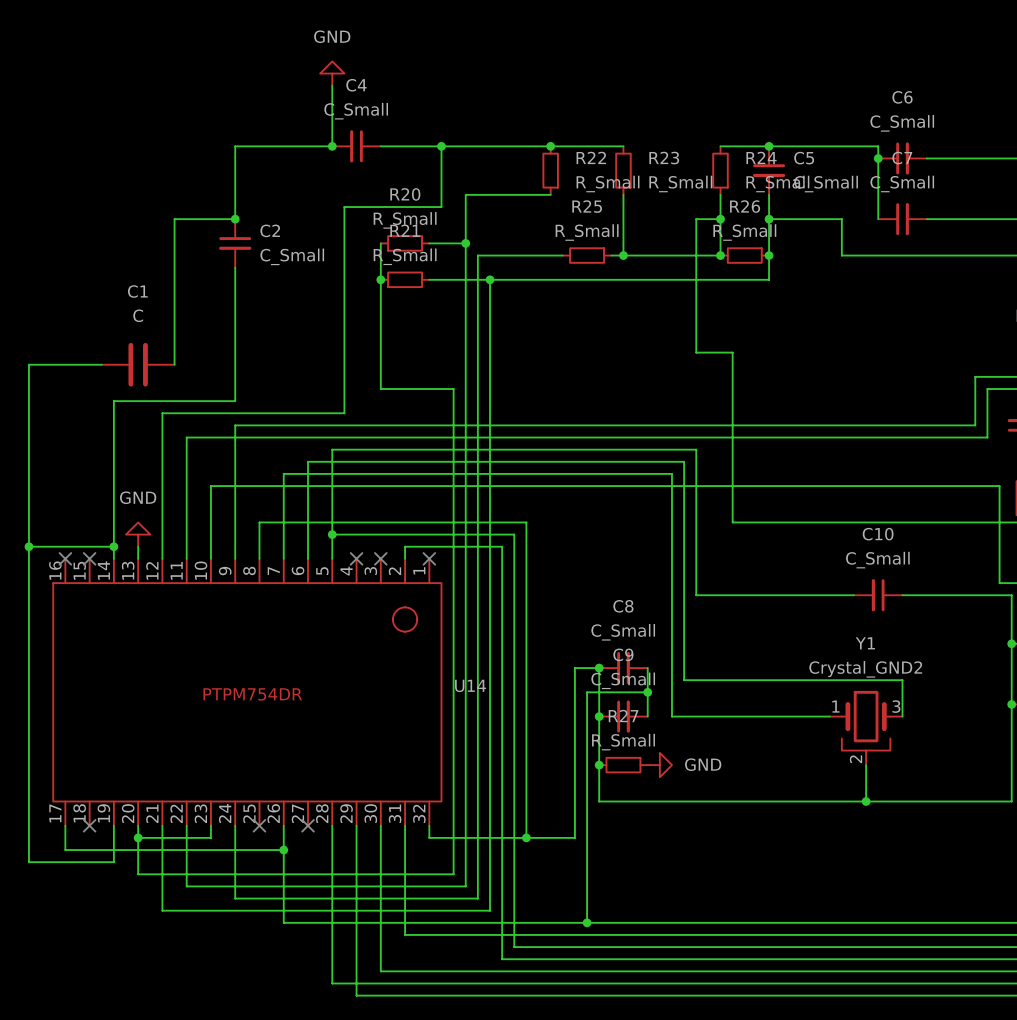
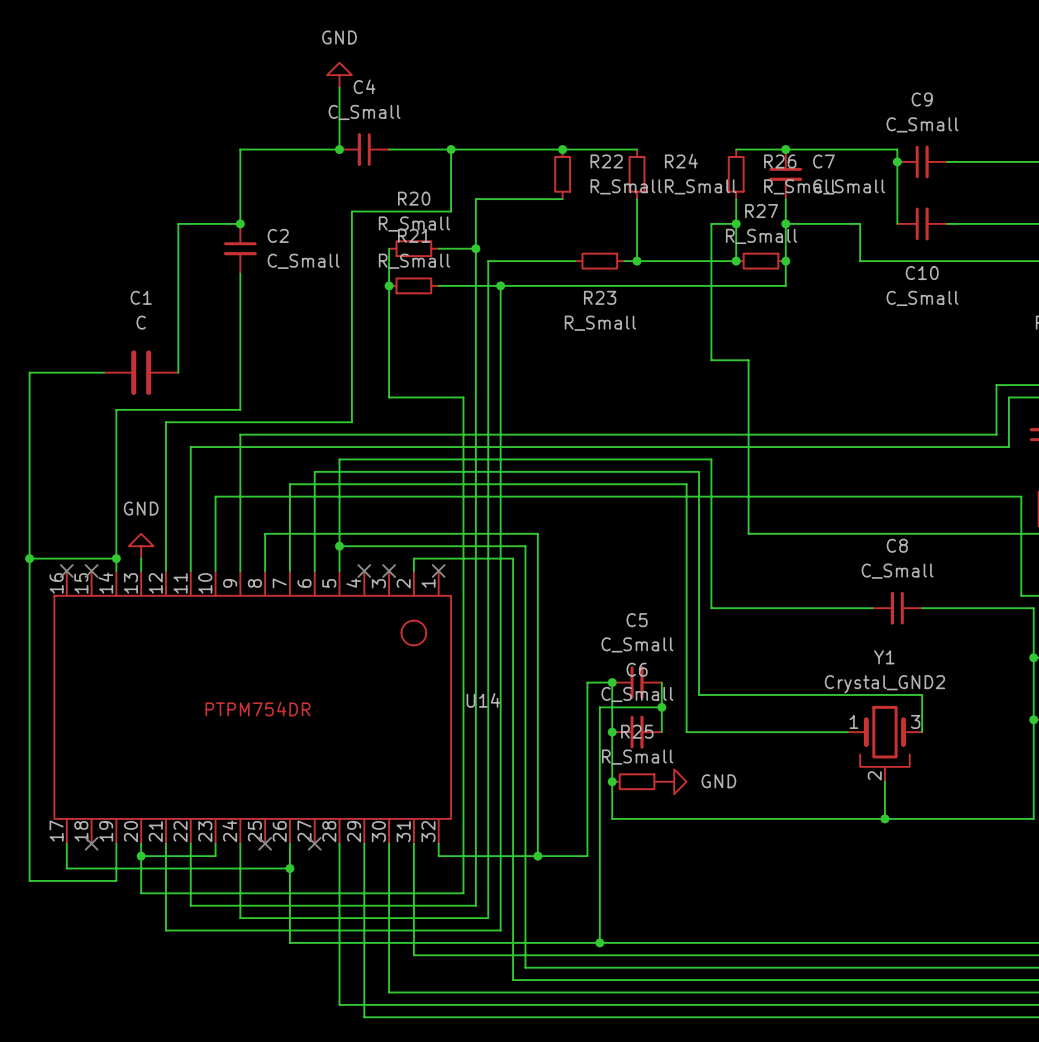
C6 name: C6 (902, 97) -> C9 (922, 99)
R24 name: R24 (761, 157) -> R26 (780, 161)
R23 name: R23 (664, 158) -> R24 (681, 161)
C5 name: C5 (804, 158) -> C7 (823, 161)
C7 name: C7 (902, 158) -> C10 (922, 273)
C7 value position: C_Small (902, 184) -> C_Small (922, 298)
R25 name: R25 (587, 206) -> R23 (600, 297)
R26 name: R26 (745, 206) -> R27 (761, 211)
R25 value position: R_Small (587, 232) -> R_Small (600, 323)
C10 name: C10 (878, 534) -> C8 (897, 545)
C8 name: C8 (623, 606) -> C5 (637, 620)
C9 name: C9 (623, 654) -> C6 (637, 669)
R27 name: R27 (623, 716) -> R25 (637, 731)

